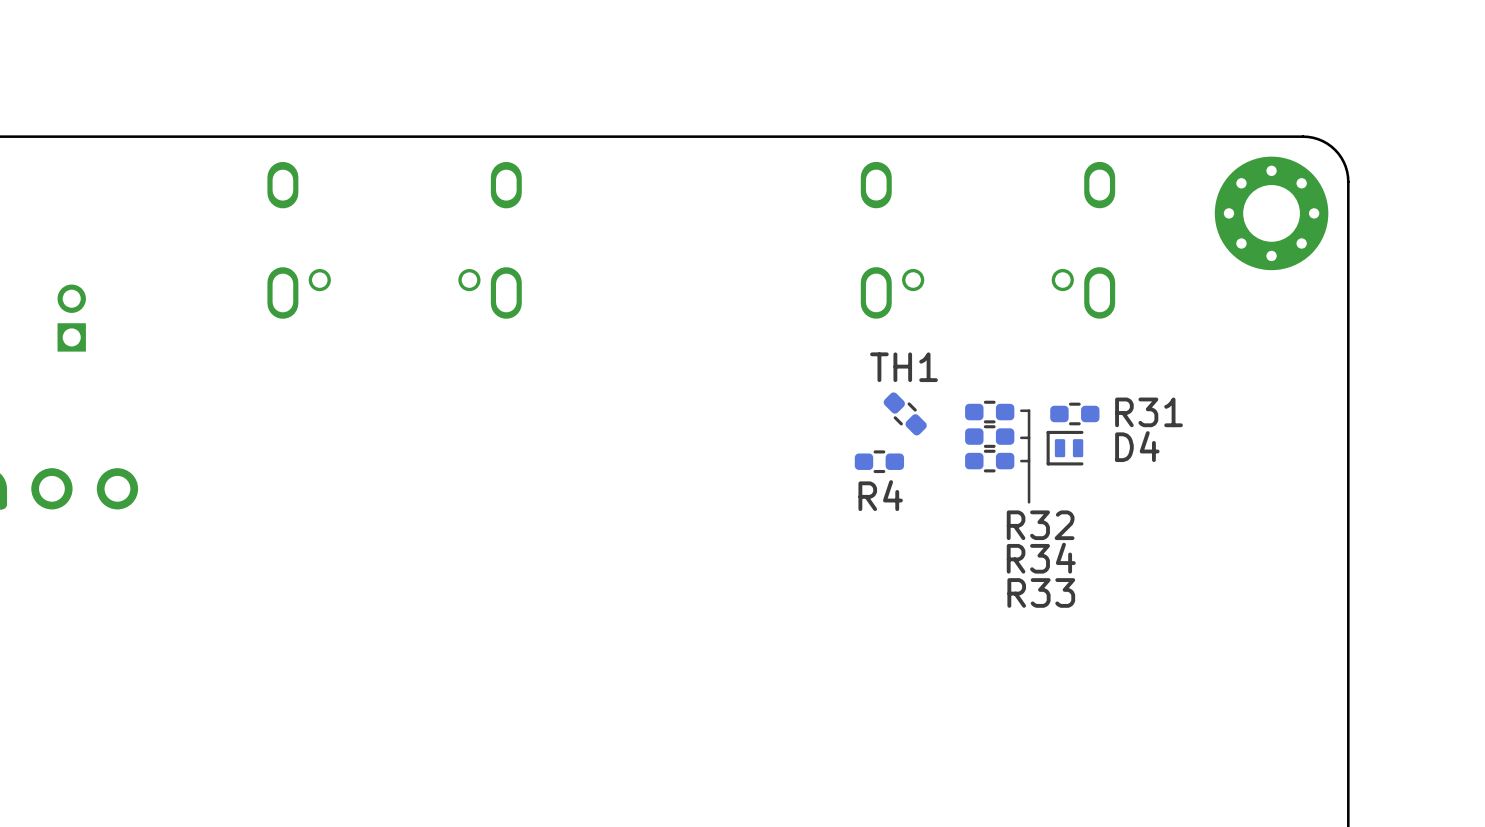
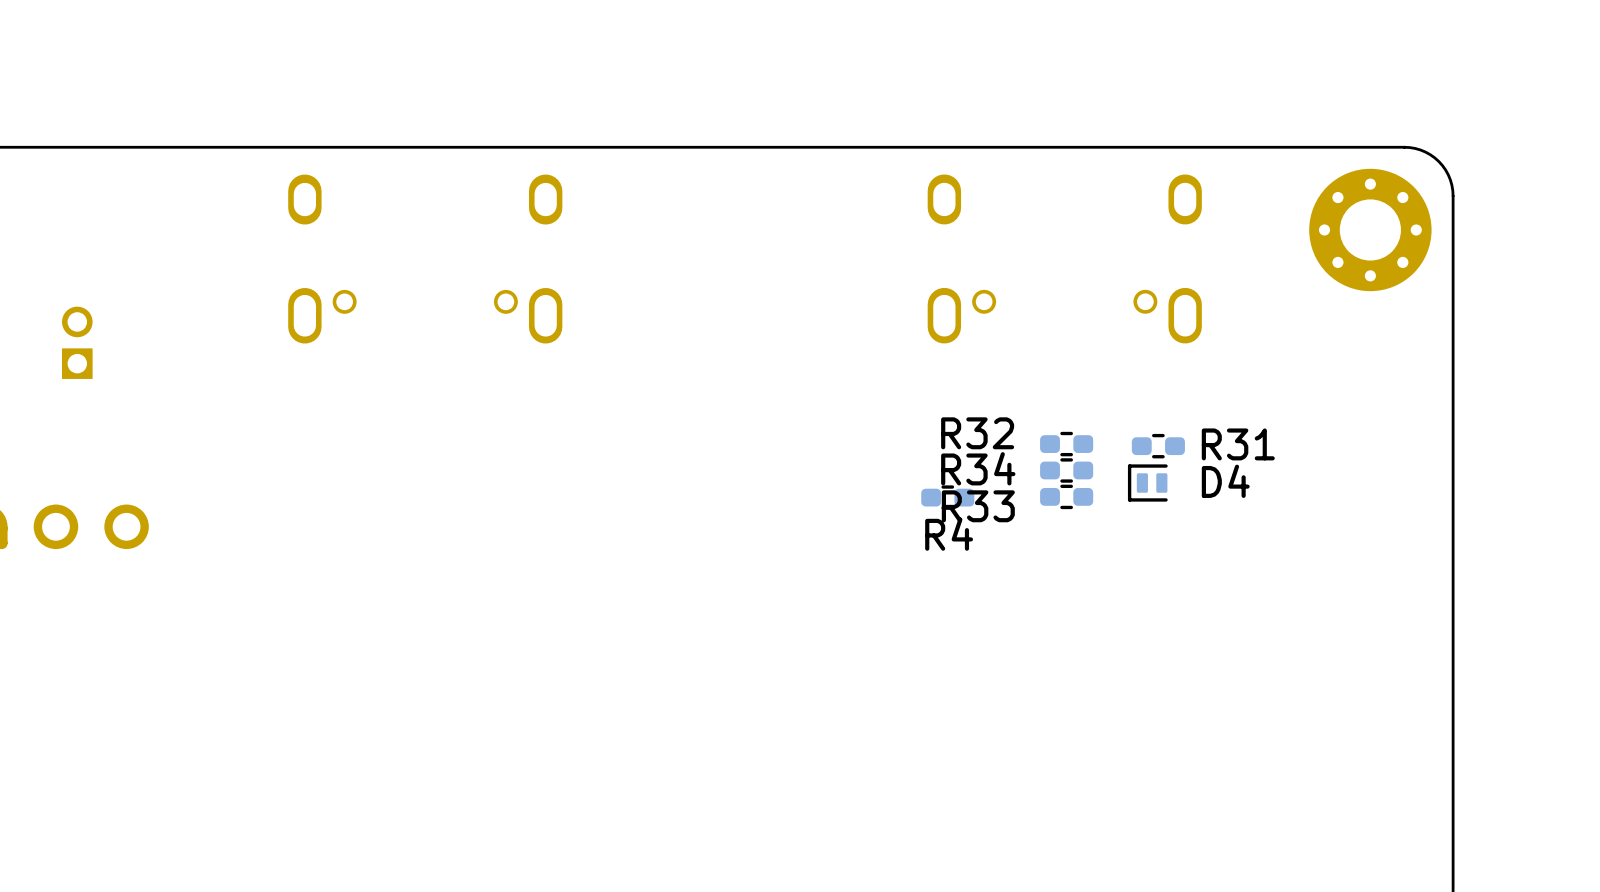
line: (1021, 410) (1029, 410) (1029, 502) -> none
TH1: (905, 413) -> none
line: (1029, 437) (1021, 437) -> none
line: (1029, 461) (1021, 461) -> none
R32 name position: R32 (1040, 525) -> R32 (977, 433)
R34 name position: R34 (1041, 558) -> R34 (978, 468)
R33 name position: R33 (1041, 592) -> R33 (978, 506)

